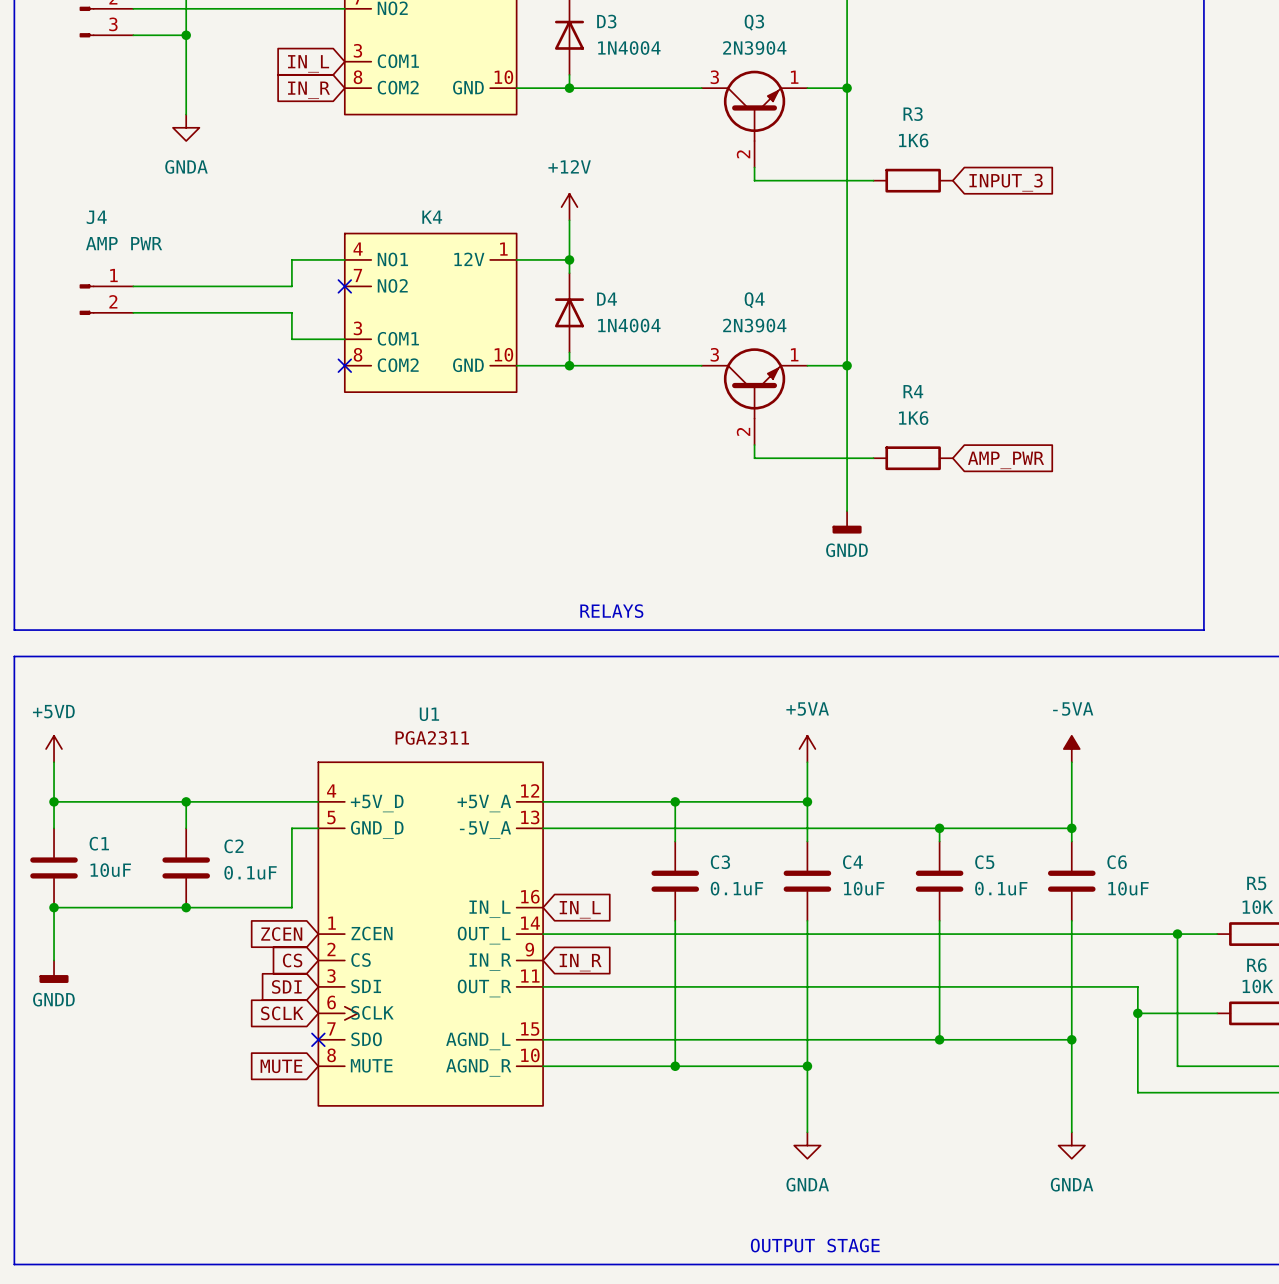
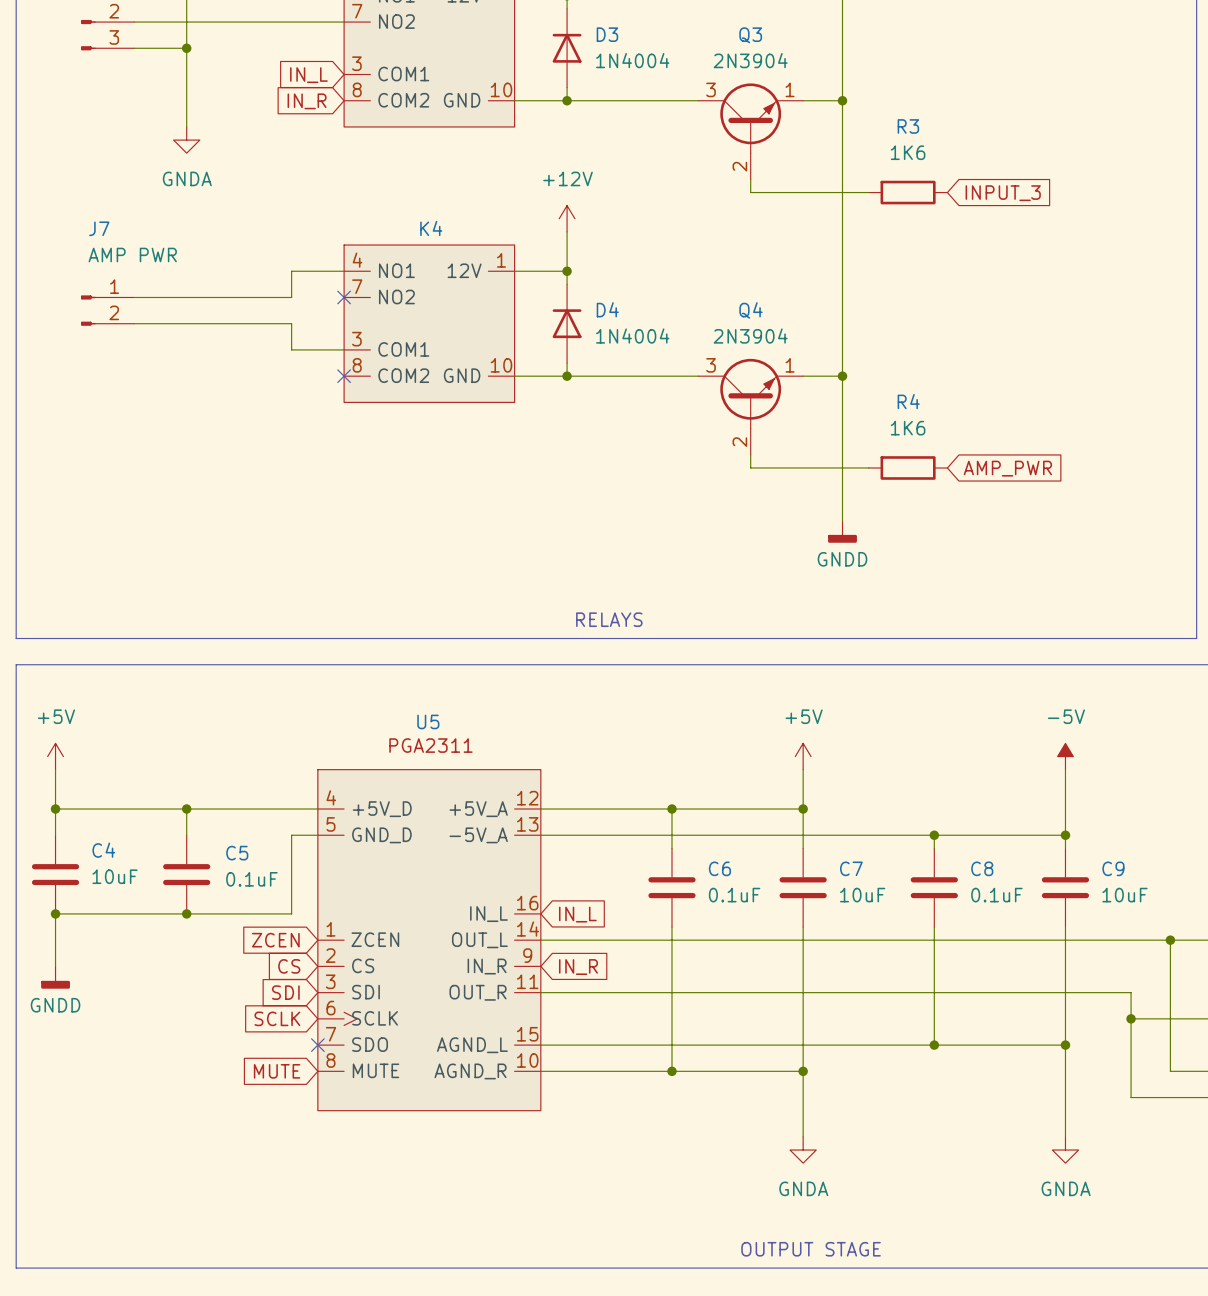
J4 name: J4 (96, 217) -> J7 (99, 228)
U1 name: U1 (429, 714) -> U5 (428, 721)
power symbol: +5VD (54, 749) -> +5V (55, 756)
power symbol: +5VA (807, 749) -> +5V (803, 756)
power symbol: -5VA (1071, 749) -> -5V (1065, 756)
C1 name: C1 (99, 843) -> C4 (103, 850)
C2 name: C2 (233, 846) -> C5 (237, 853)
C3 name: C3 (720, 862) -> C6 (719, 868)
C4 name: C4 (852, 862) -> C7 (851, 868)
C5 name: C5 (984, 862) -> C8 (982, 868)
C6 name: C6 (1117, 862) -> C9 (1113, 868)

